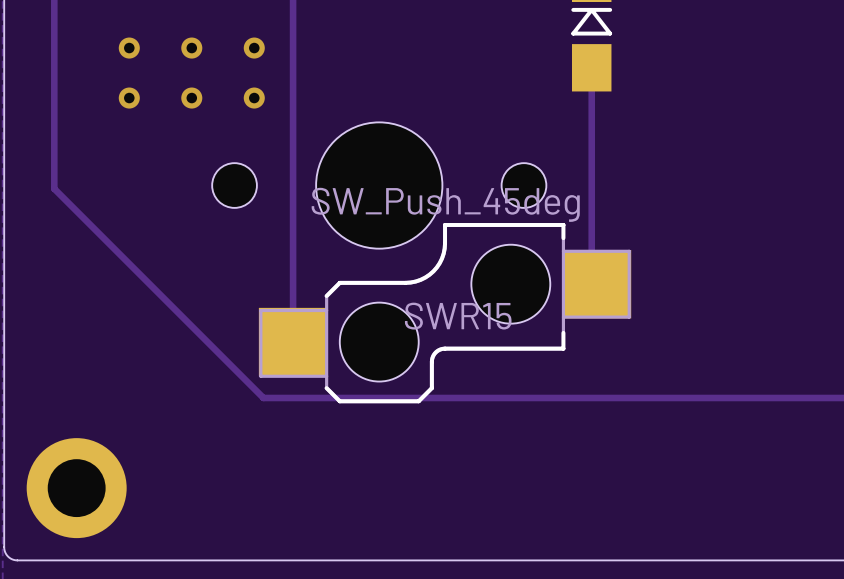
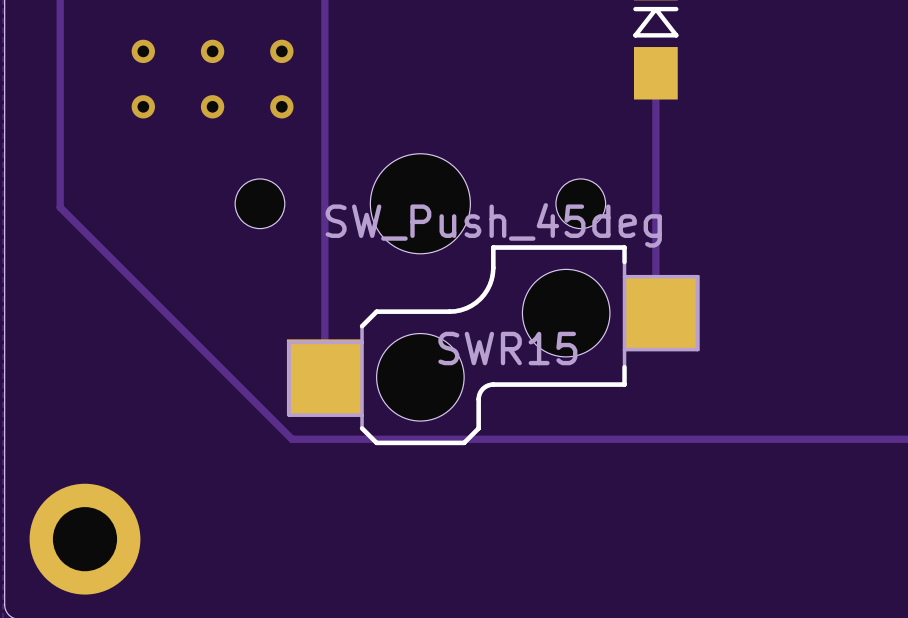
SWR15 footprint: [212, 122, 632, 404] -> [235, 153, 700, 446]

